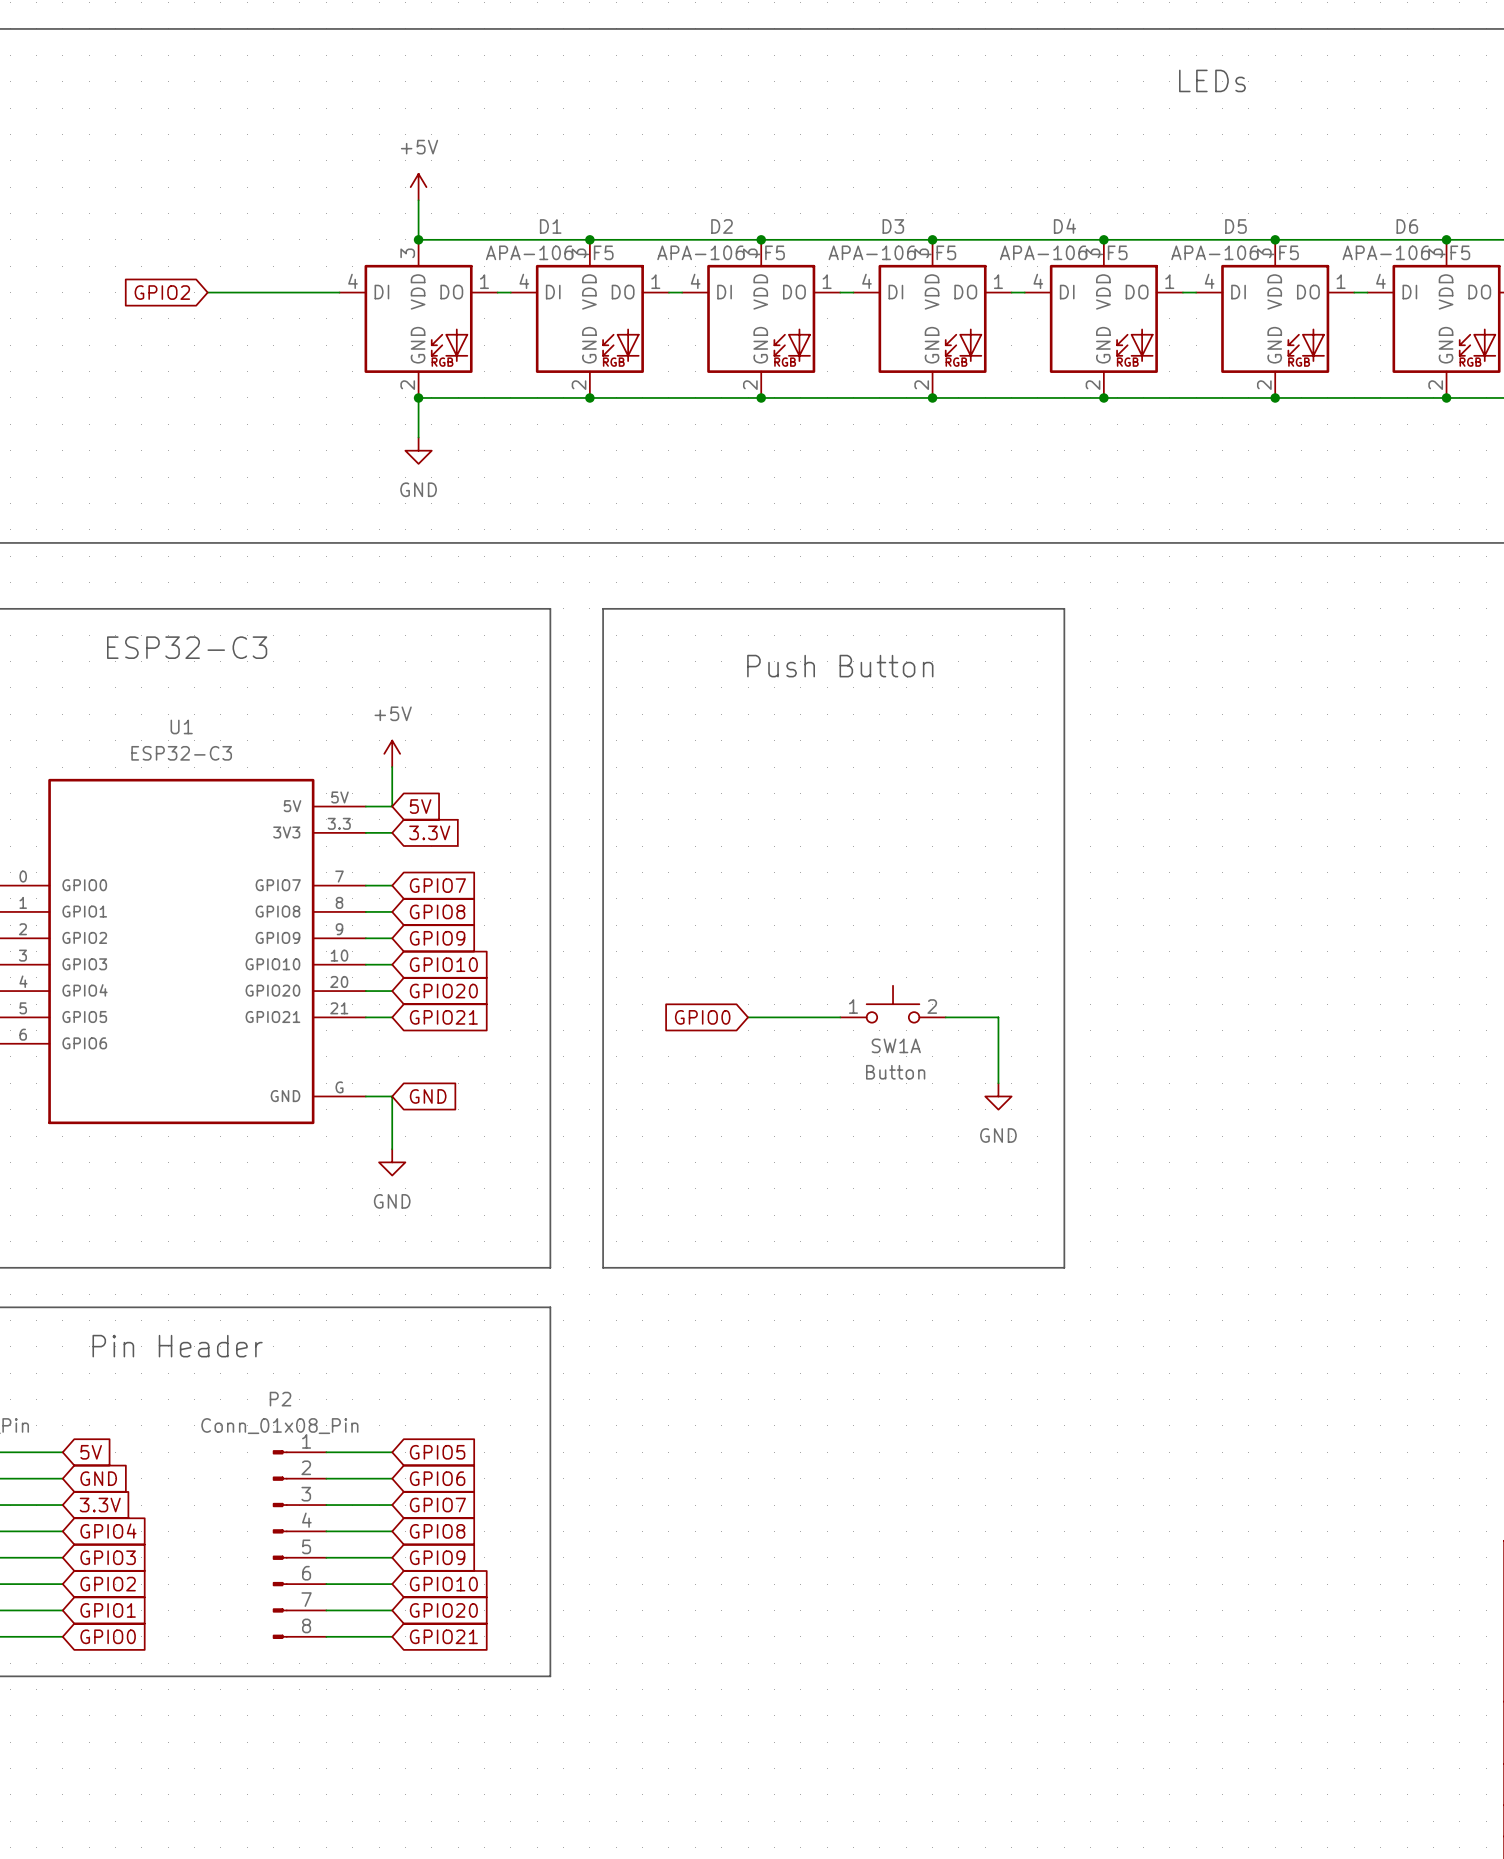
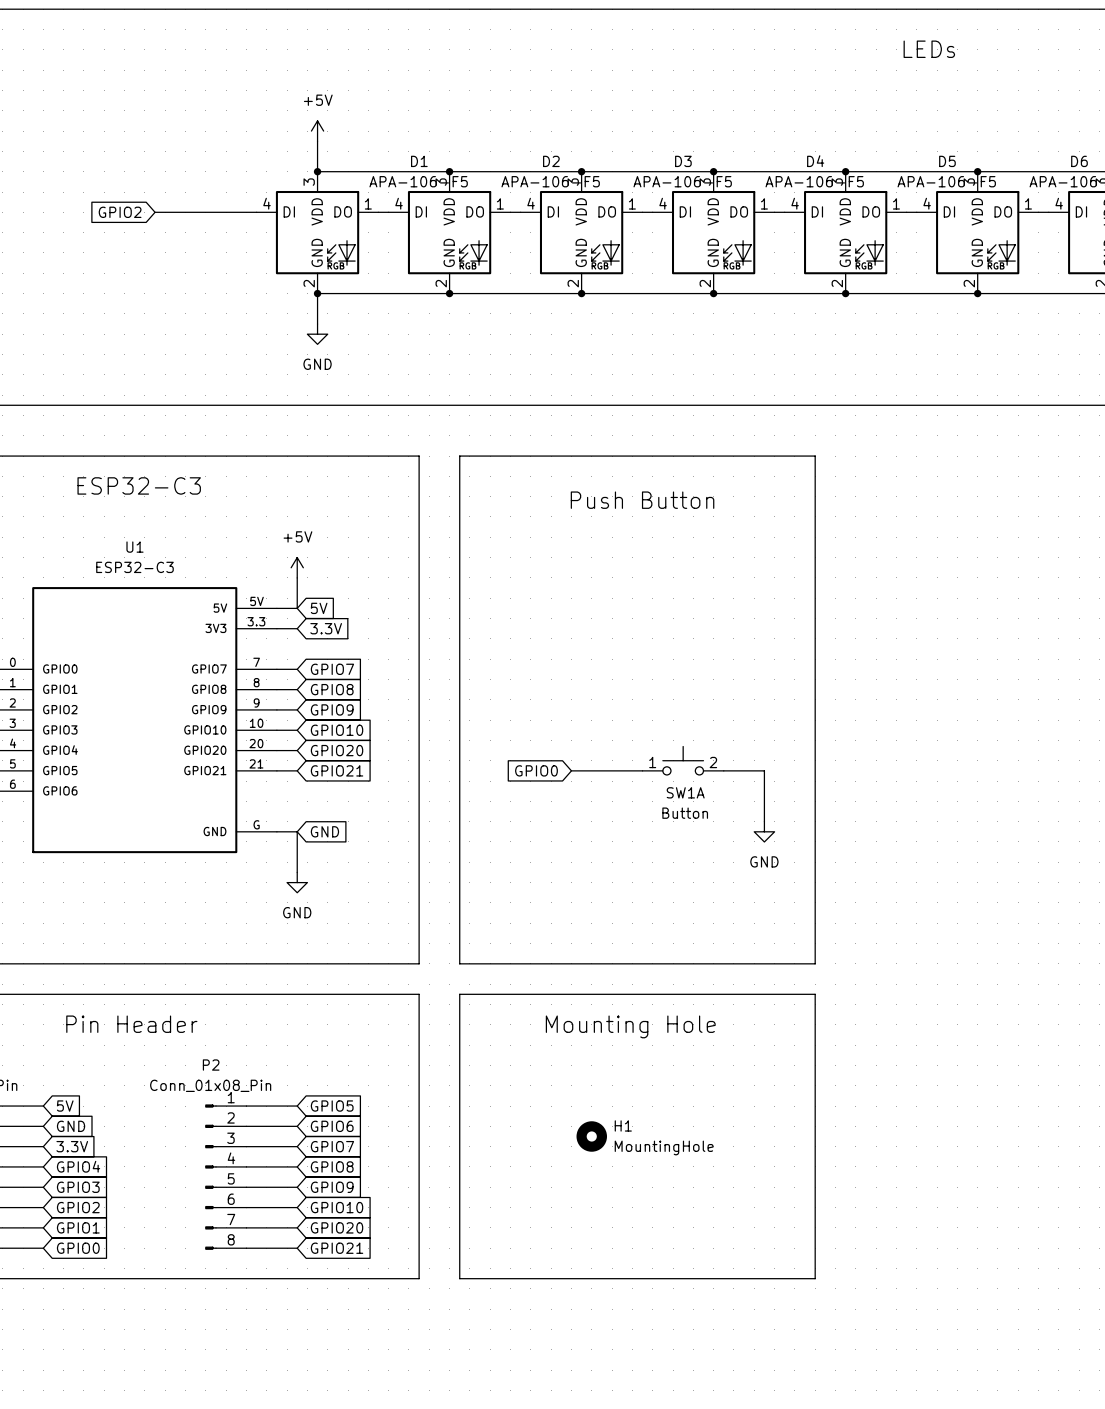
line: none -> (459, 994) (815, 994) (815, 1278) (459, 1278) (459, 994)
text: none -> Mounting Hole (630, 1026)
H1: none -> MountingHole (591, 1136)

